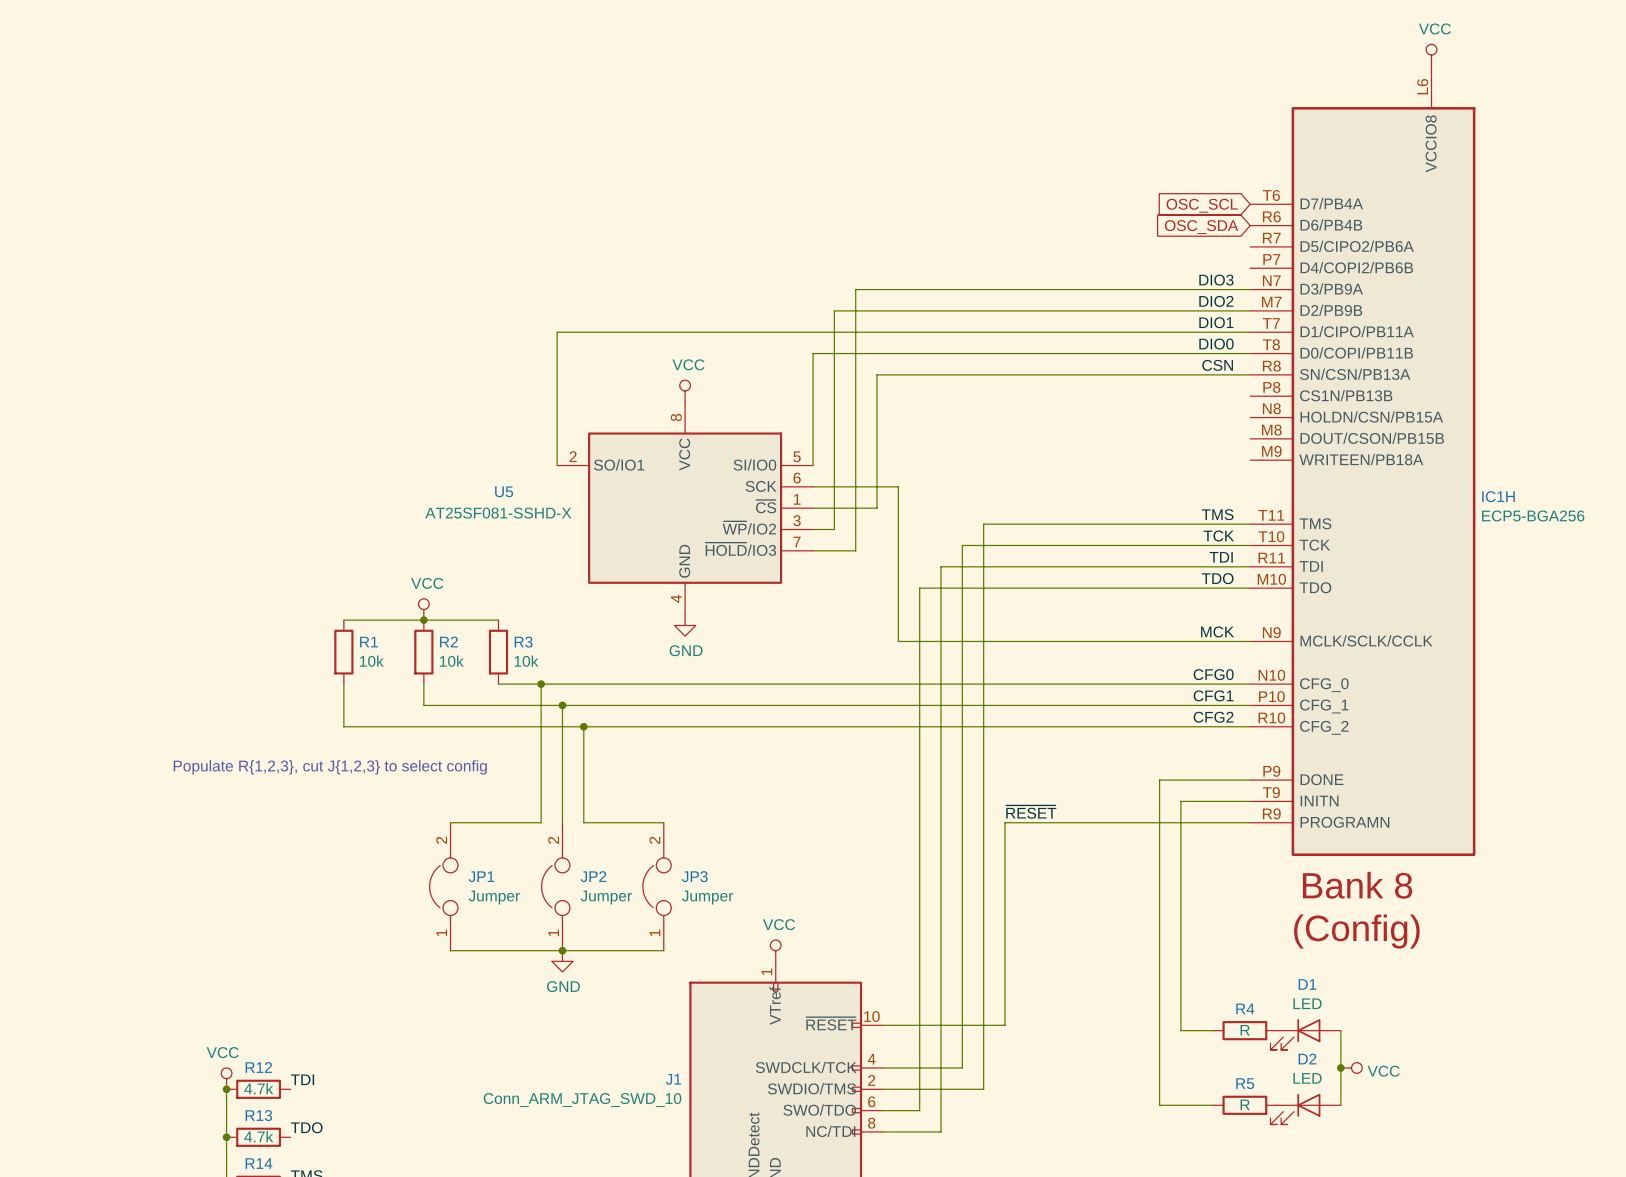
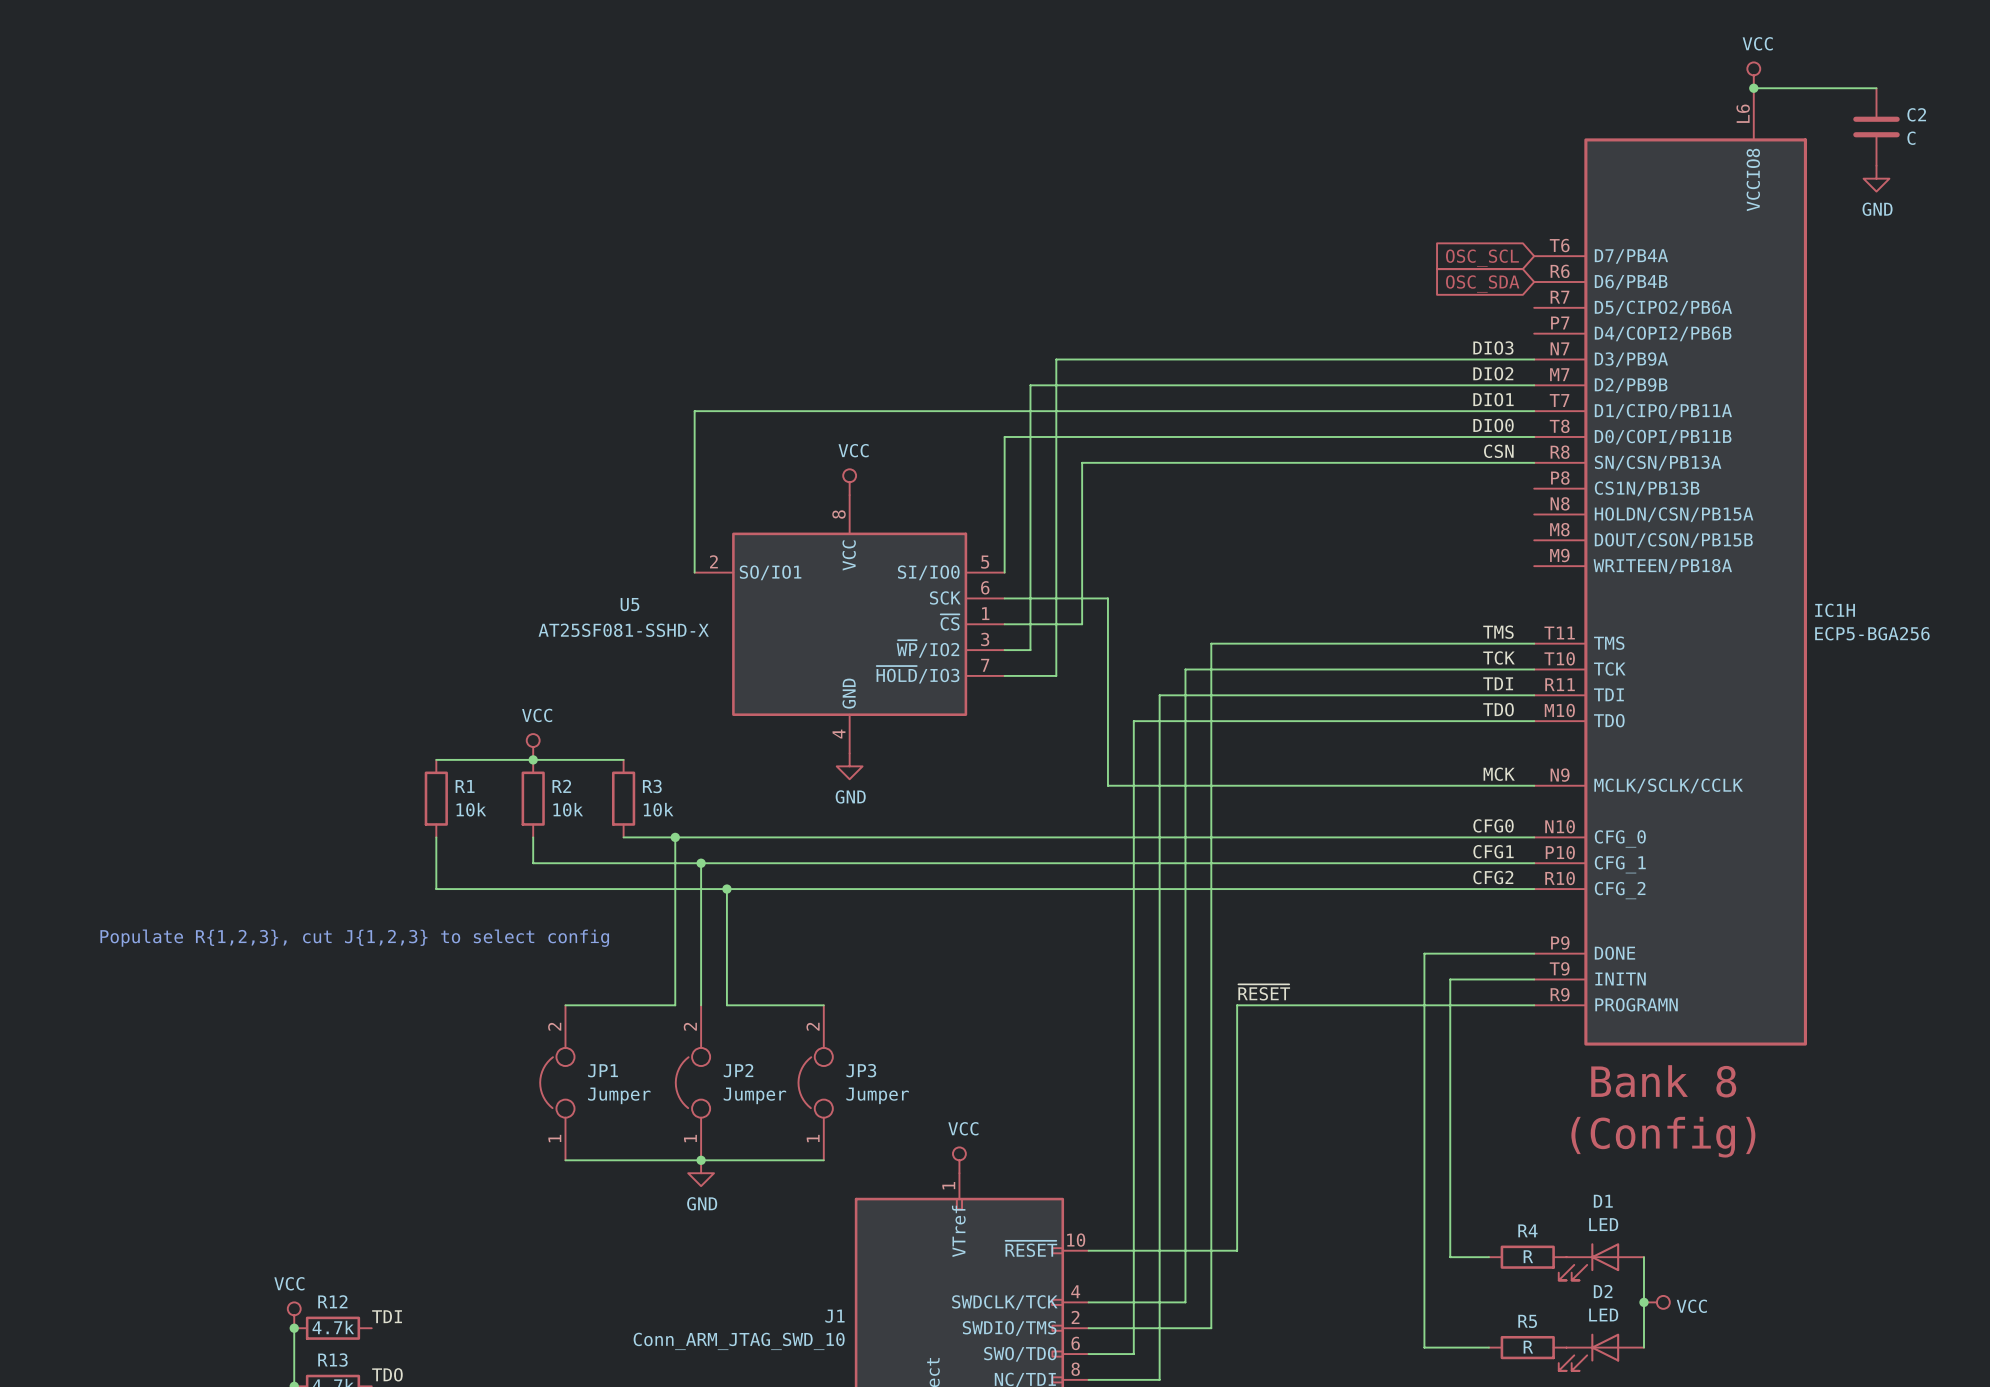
wire: none -> (1753, 88) (1876, 88)
junction: none -> (1753, 88)
C2: none -> C (1876, 127)
power symbol: none -> GND (1876, 178)

